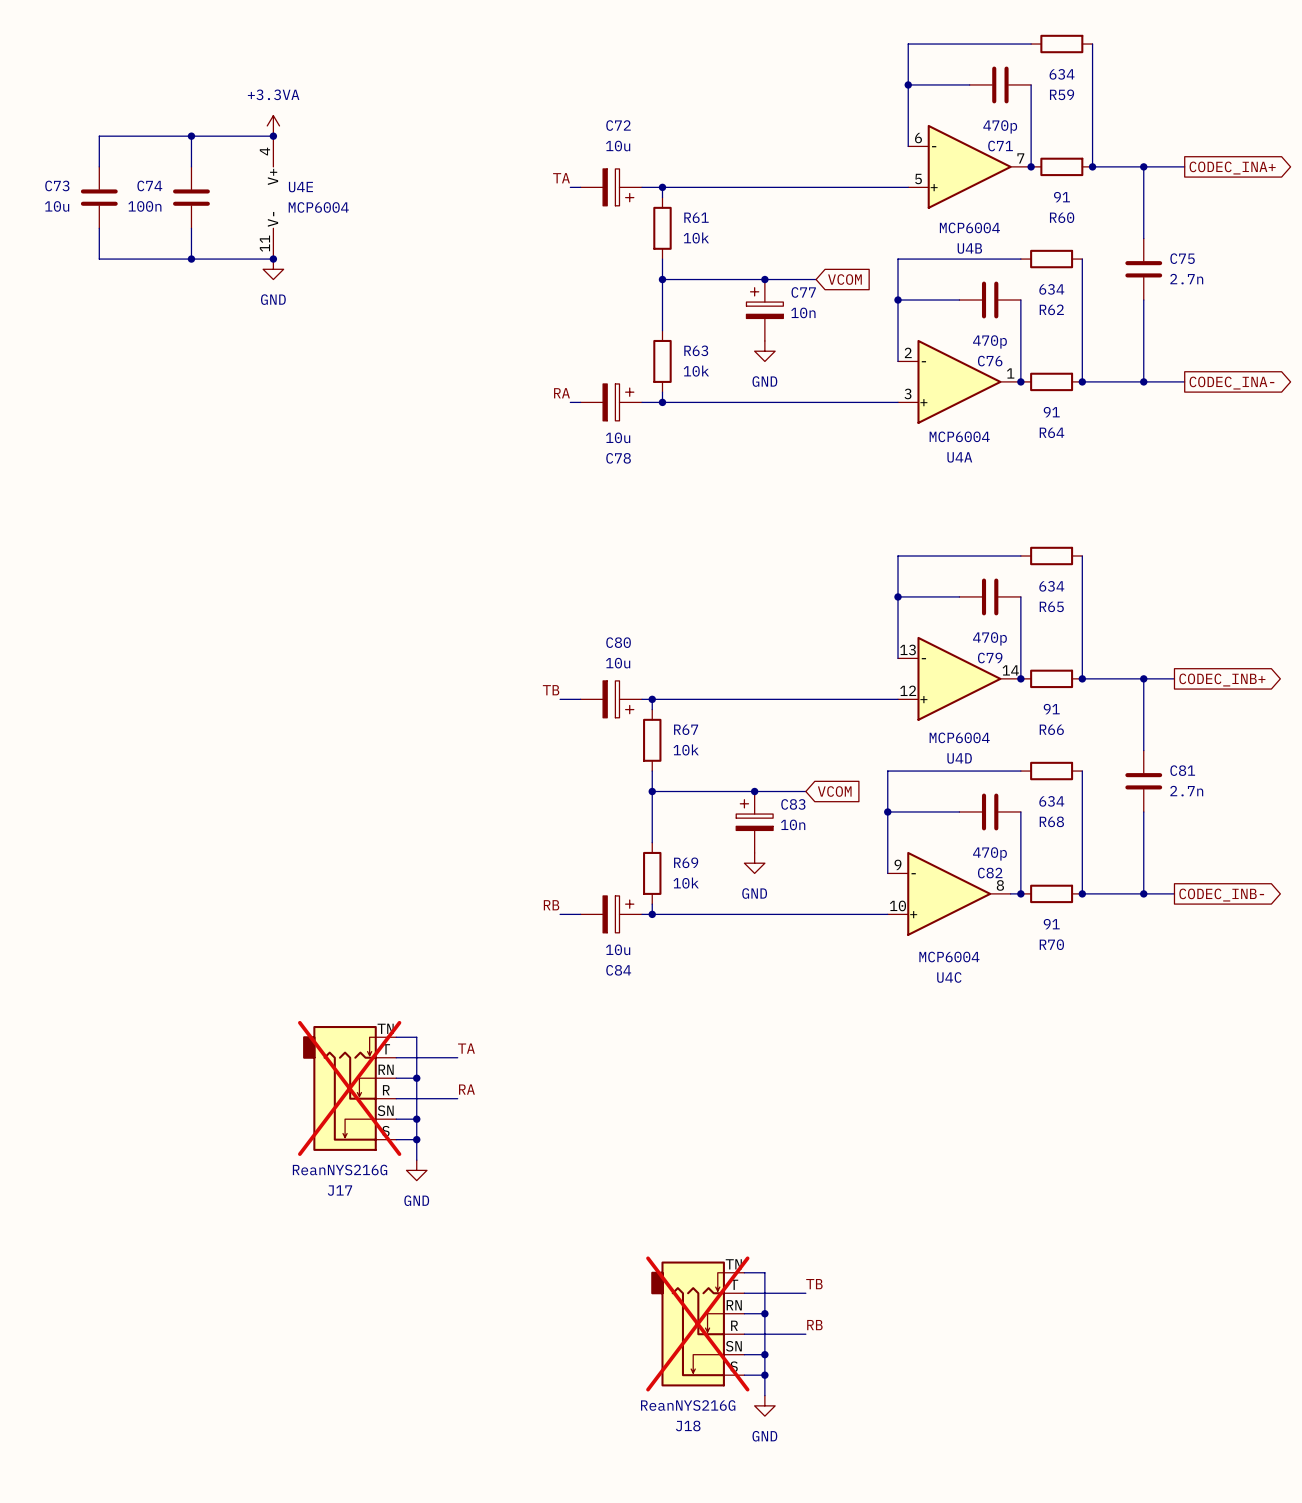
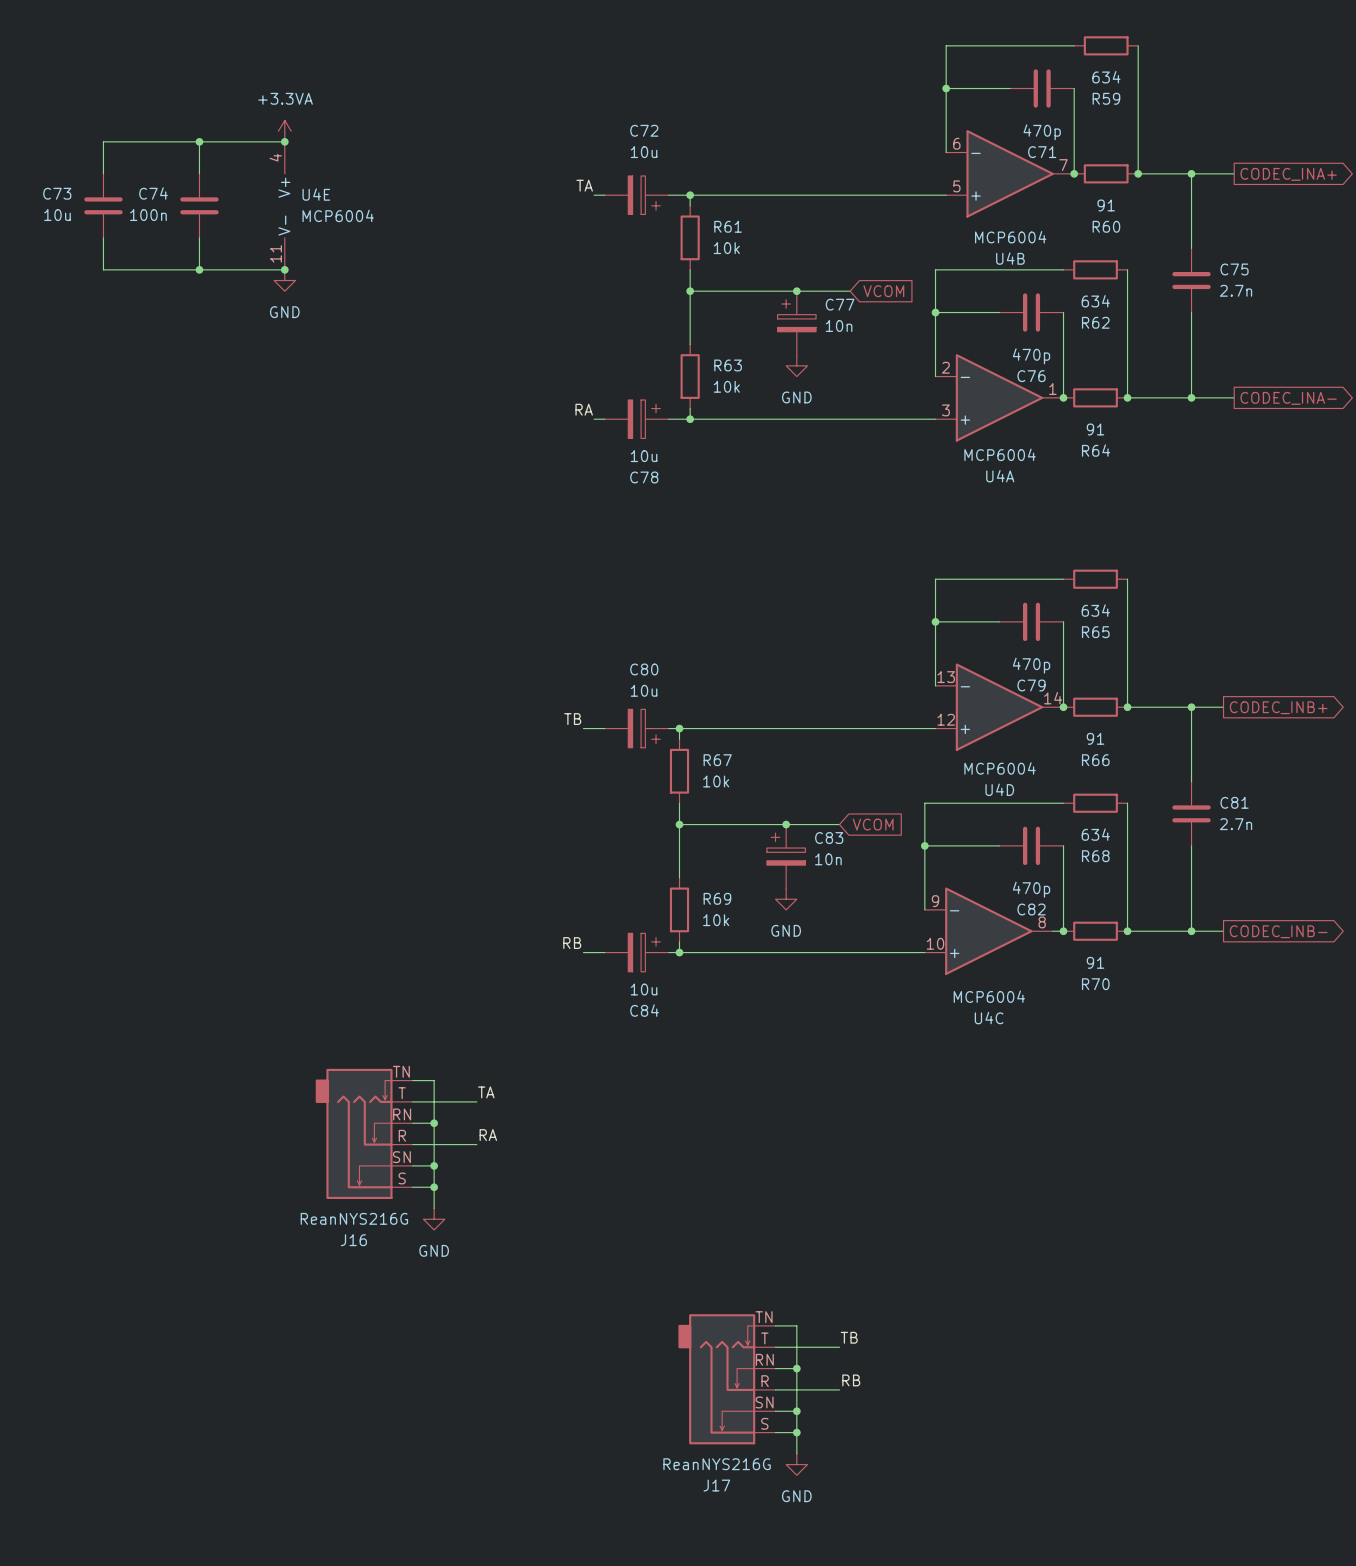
J17 do-not-place cross: (349, 1088) -> none
J17 name: J17 (339, 1190) -> J16 (353, 1240)
J18 do-not-place cross: (697, 1323) -> none
J18 name: J18 (688, 1425) -> J17 (716, 1485)

